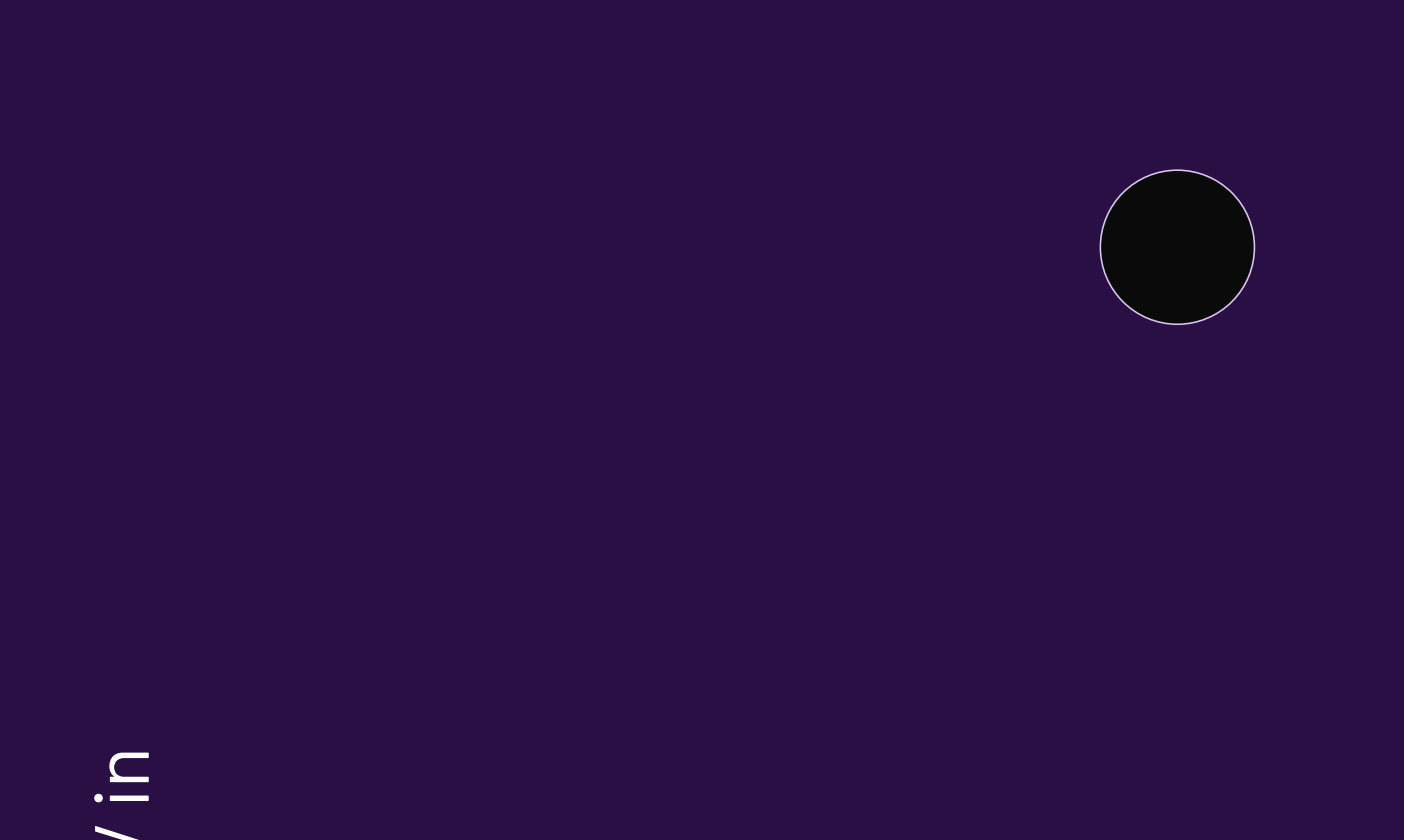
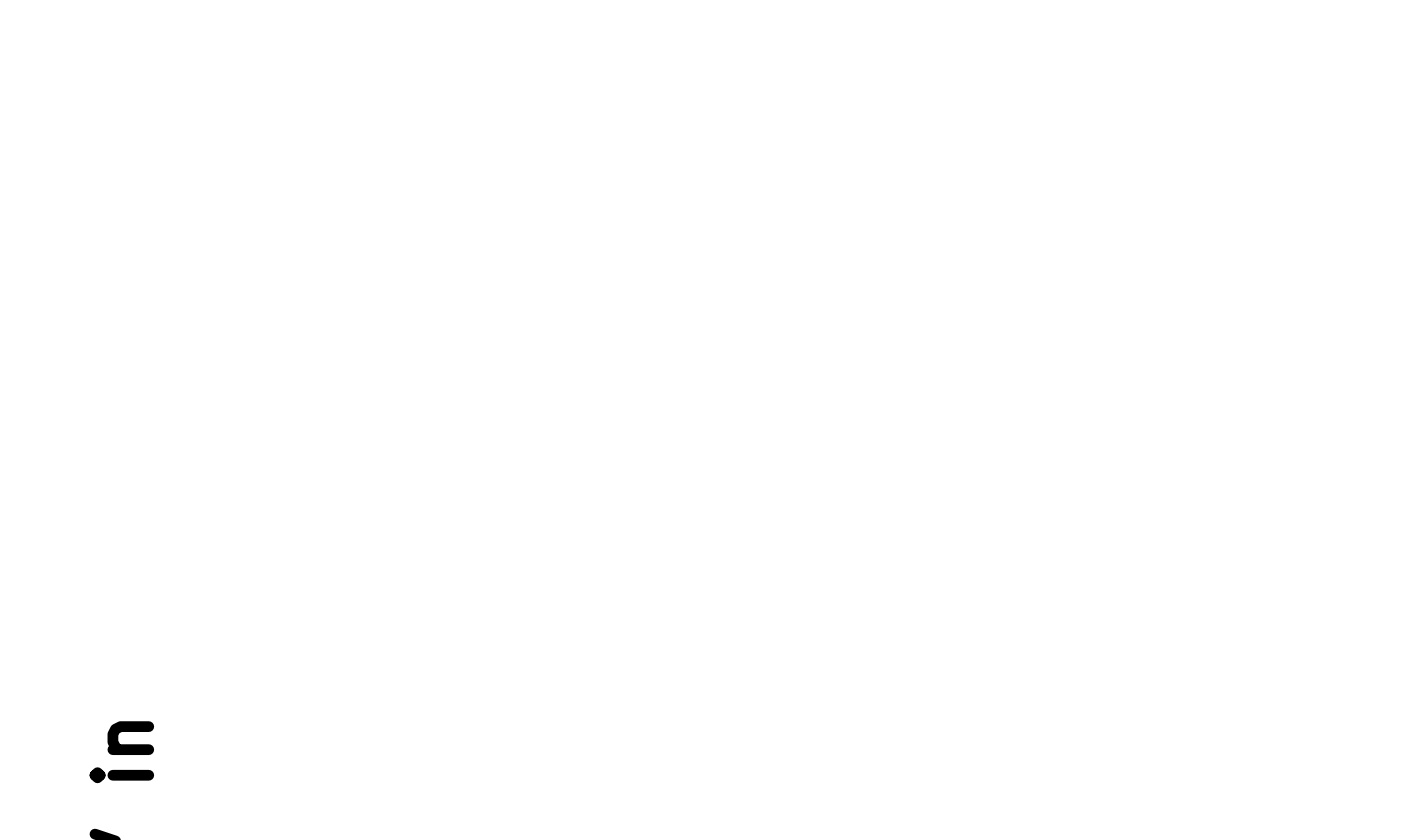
part: (1177, 247) -> none

